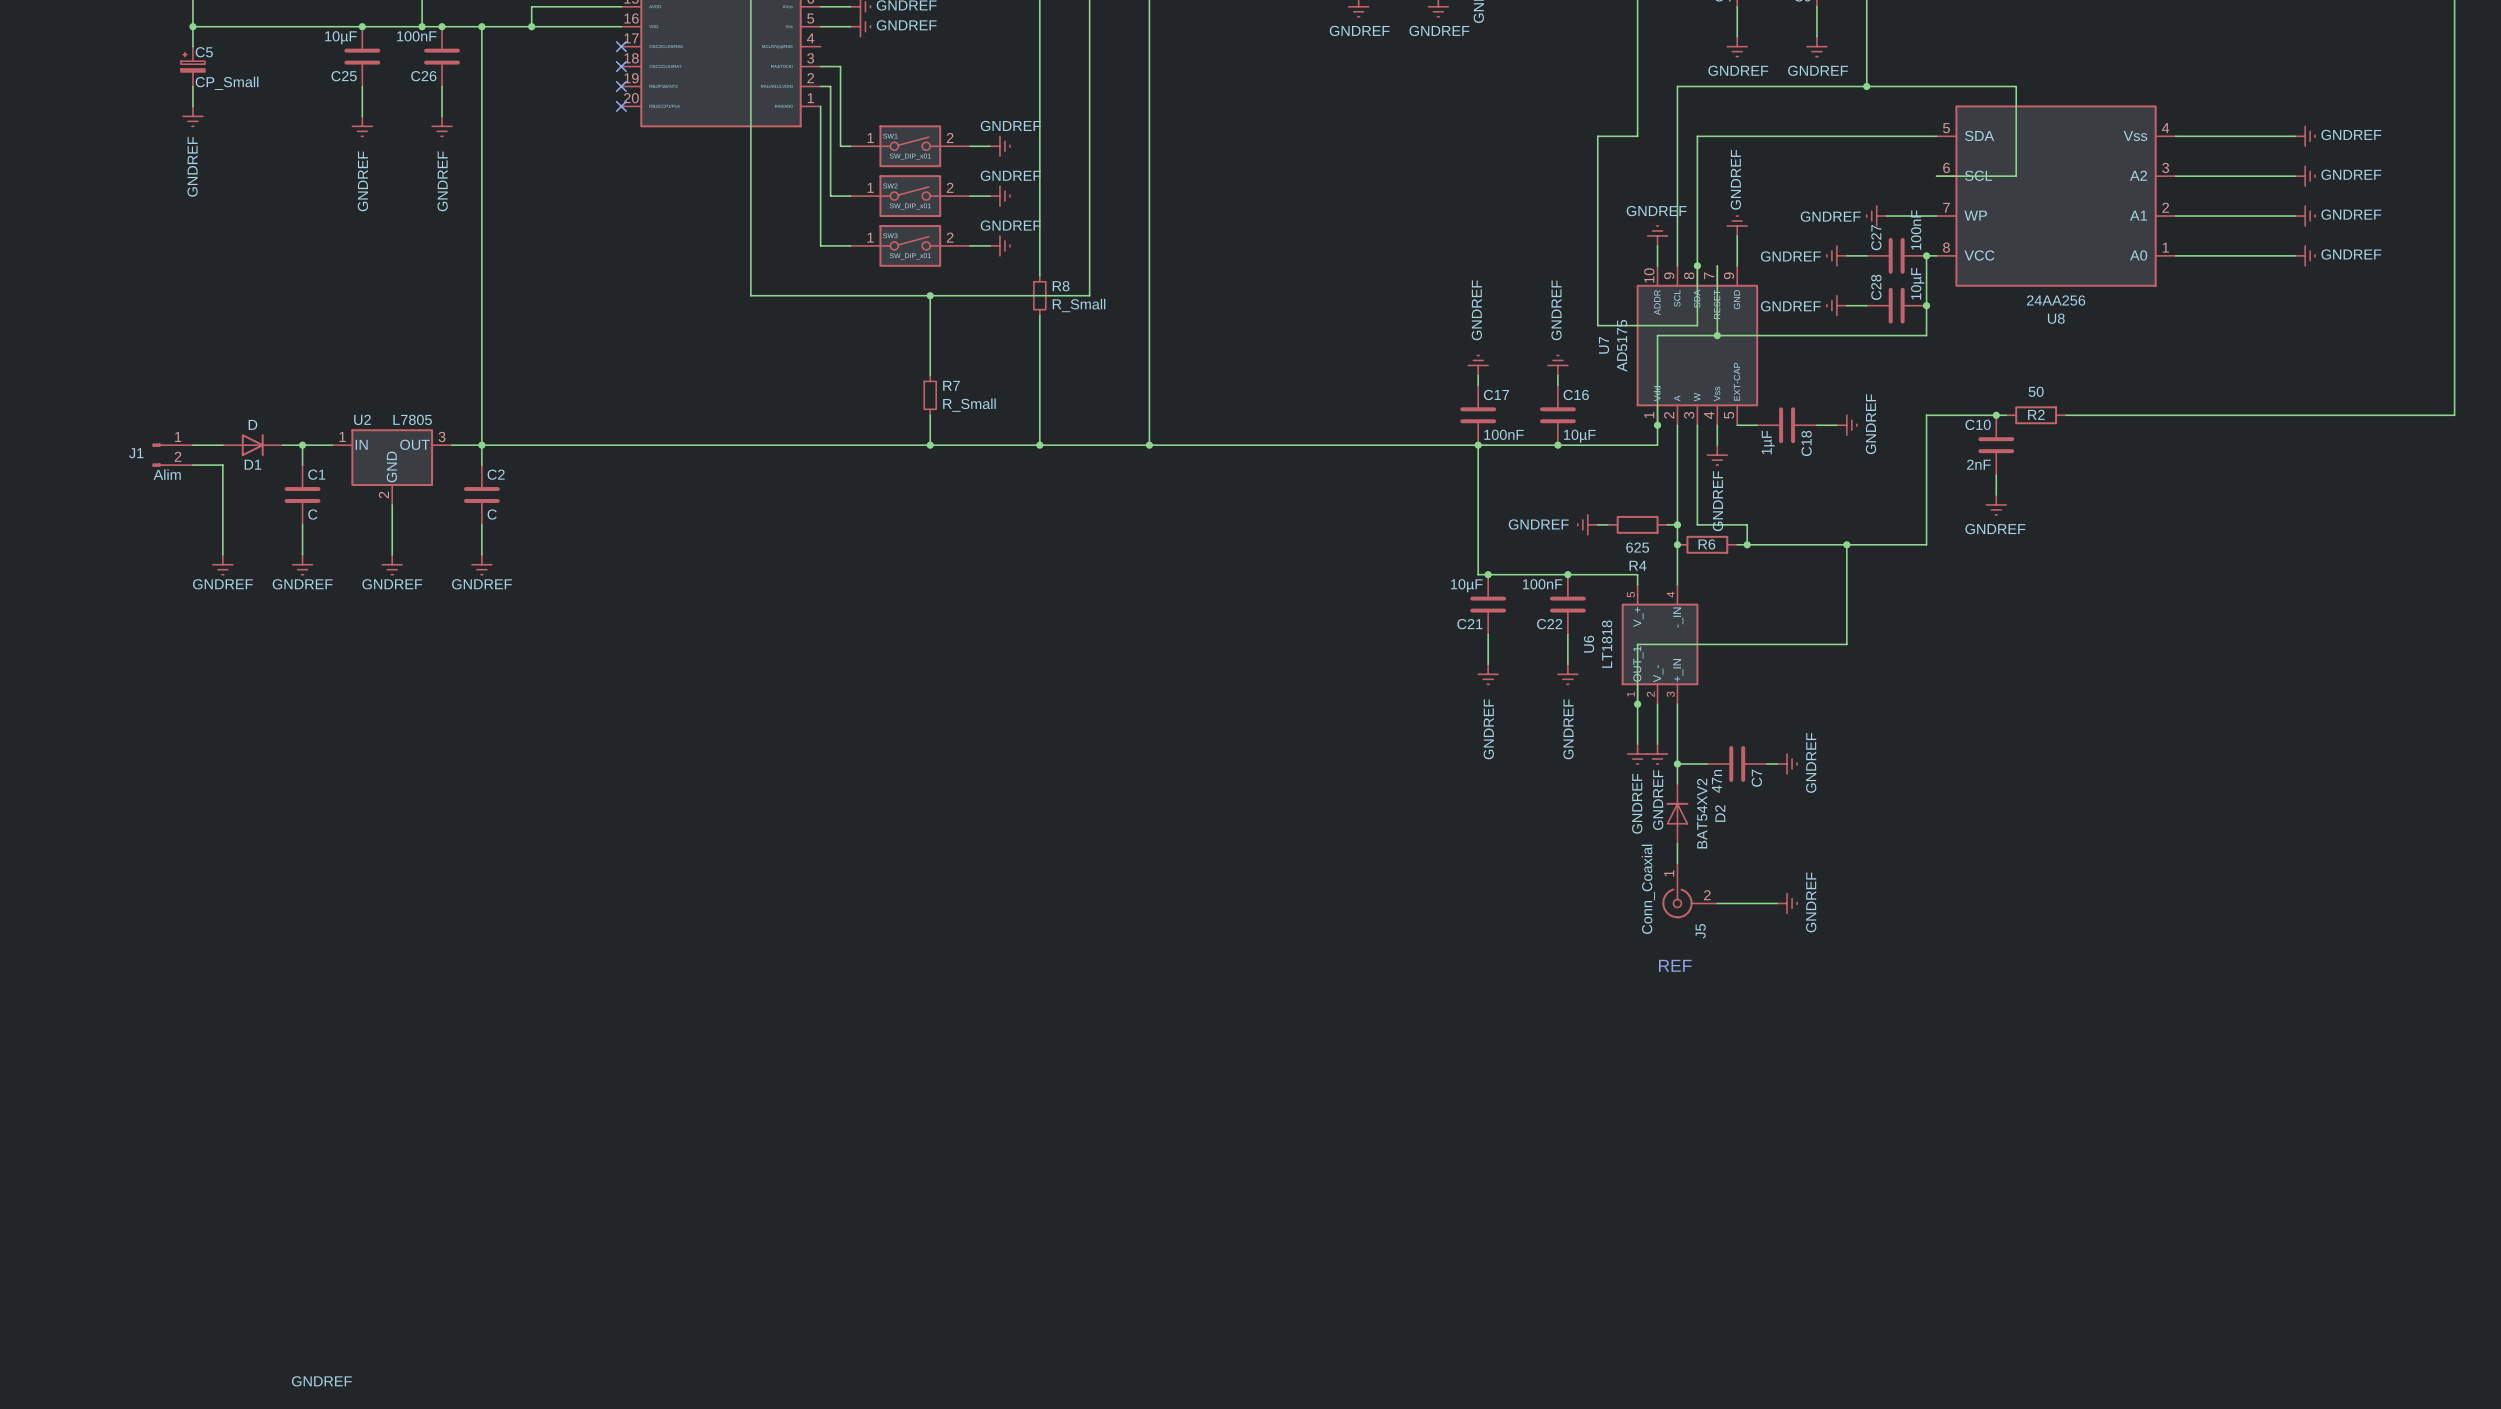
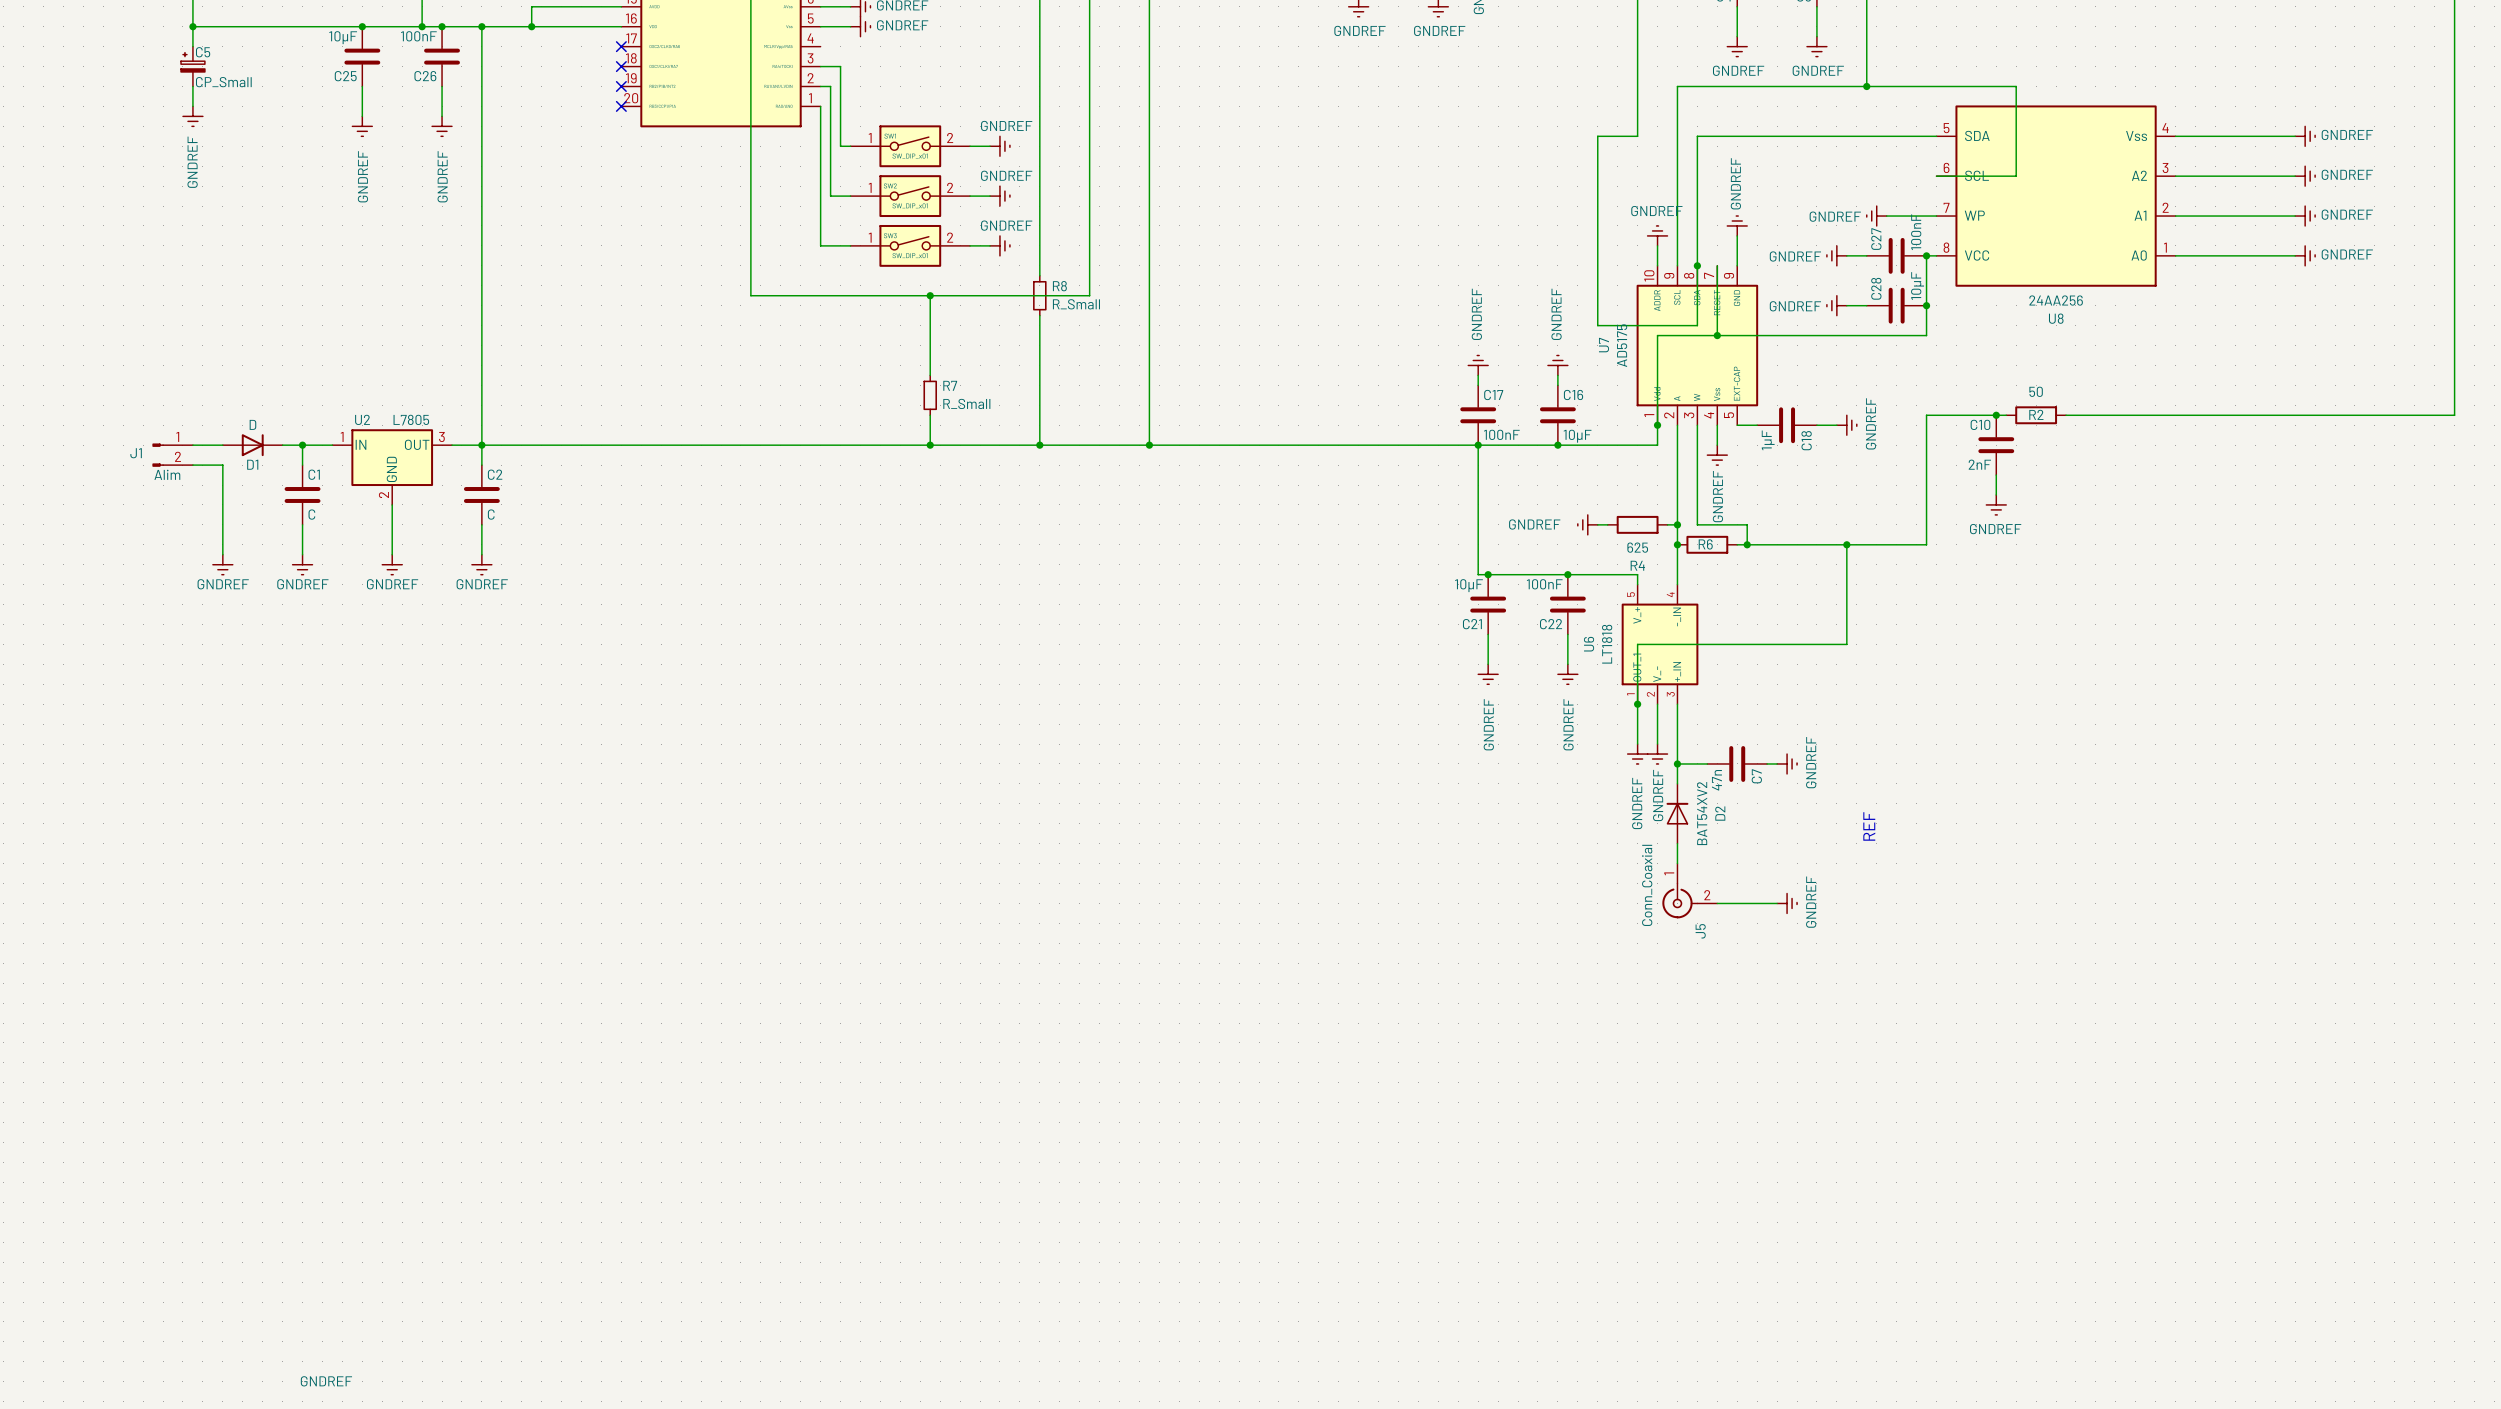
text: none -> REF (1869, 826)
text: REF (1675, 965) -> none

